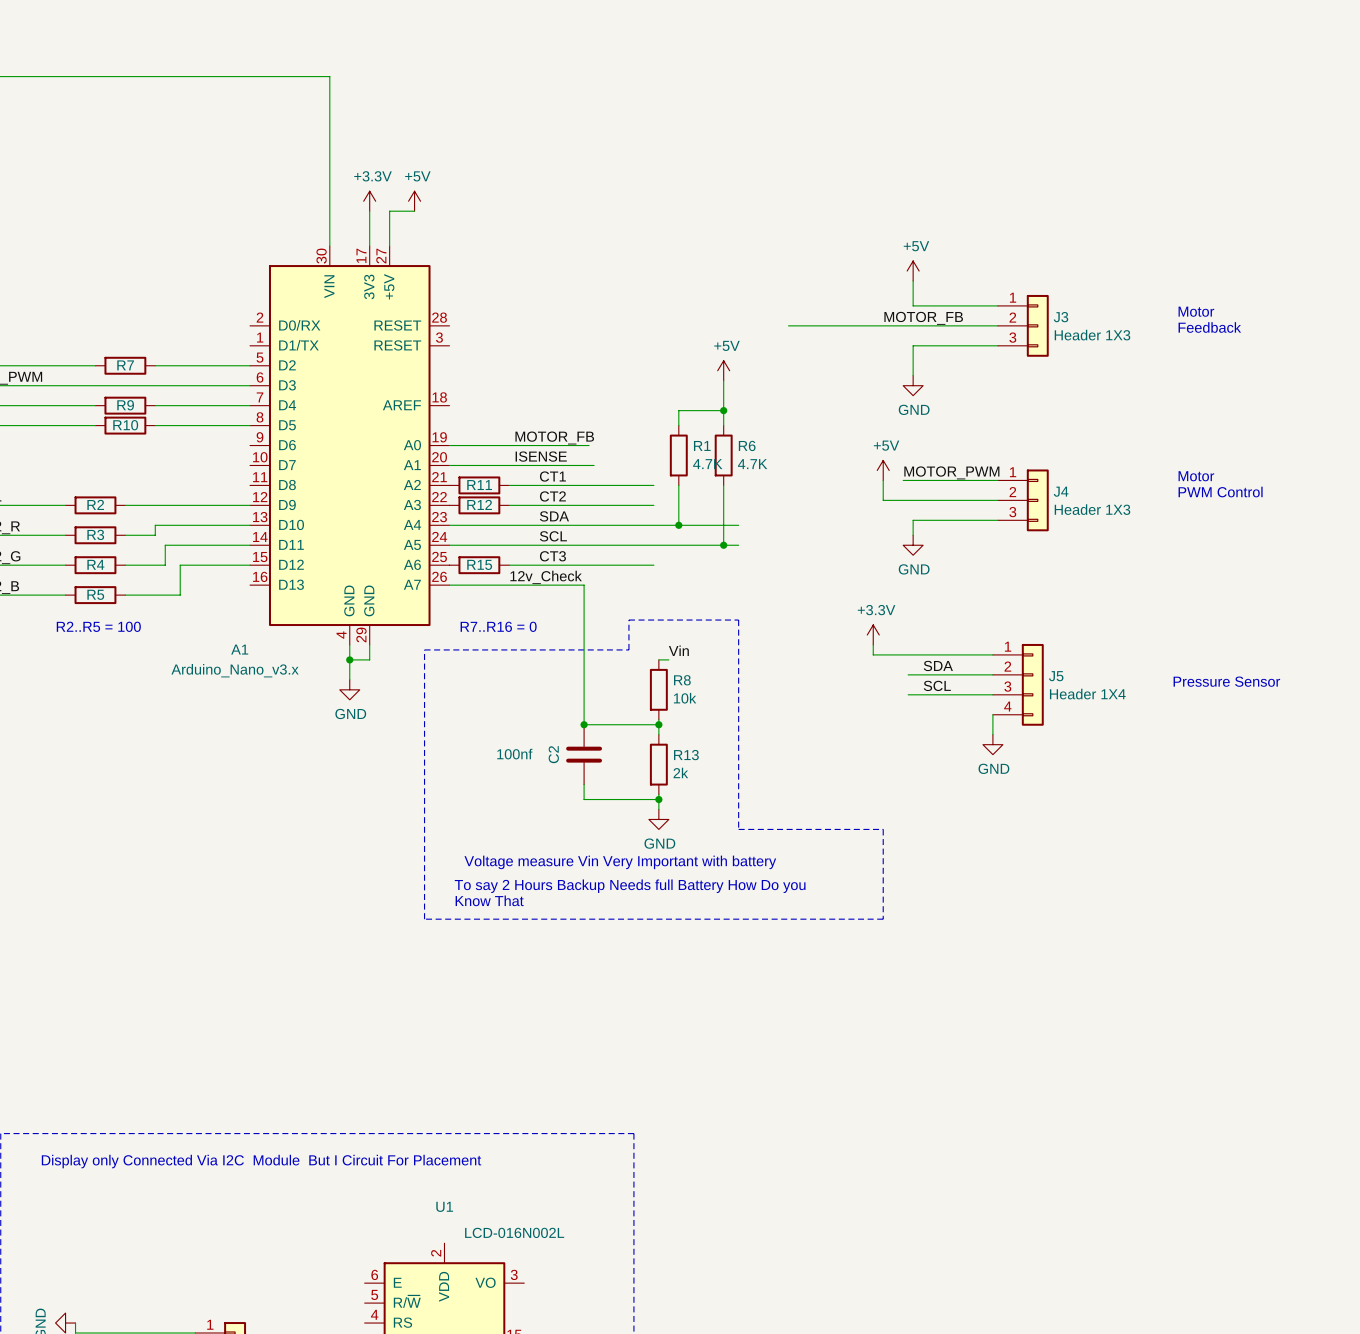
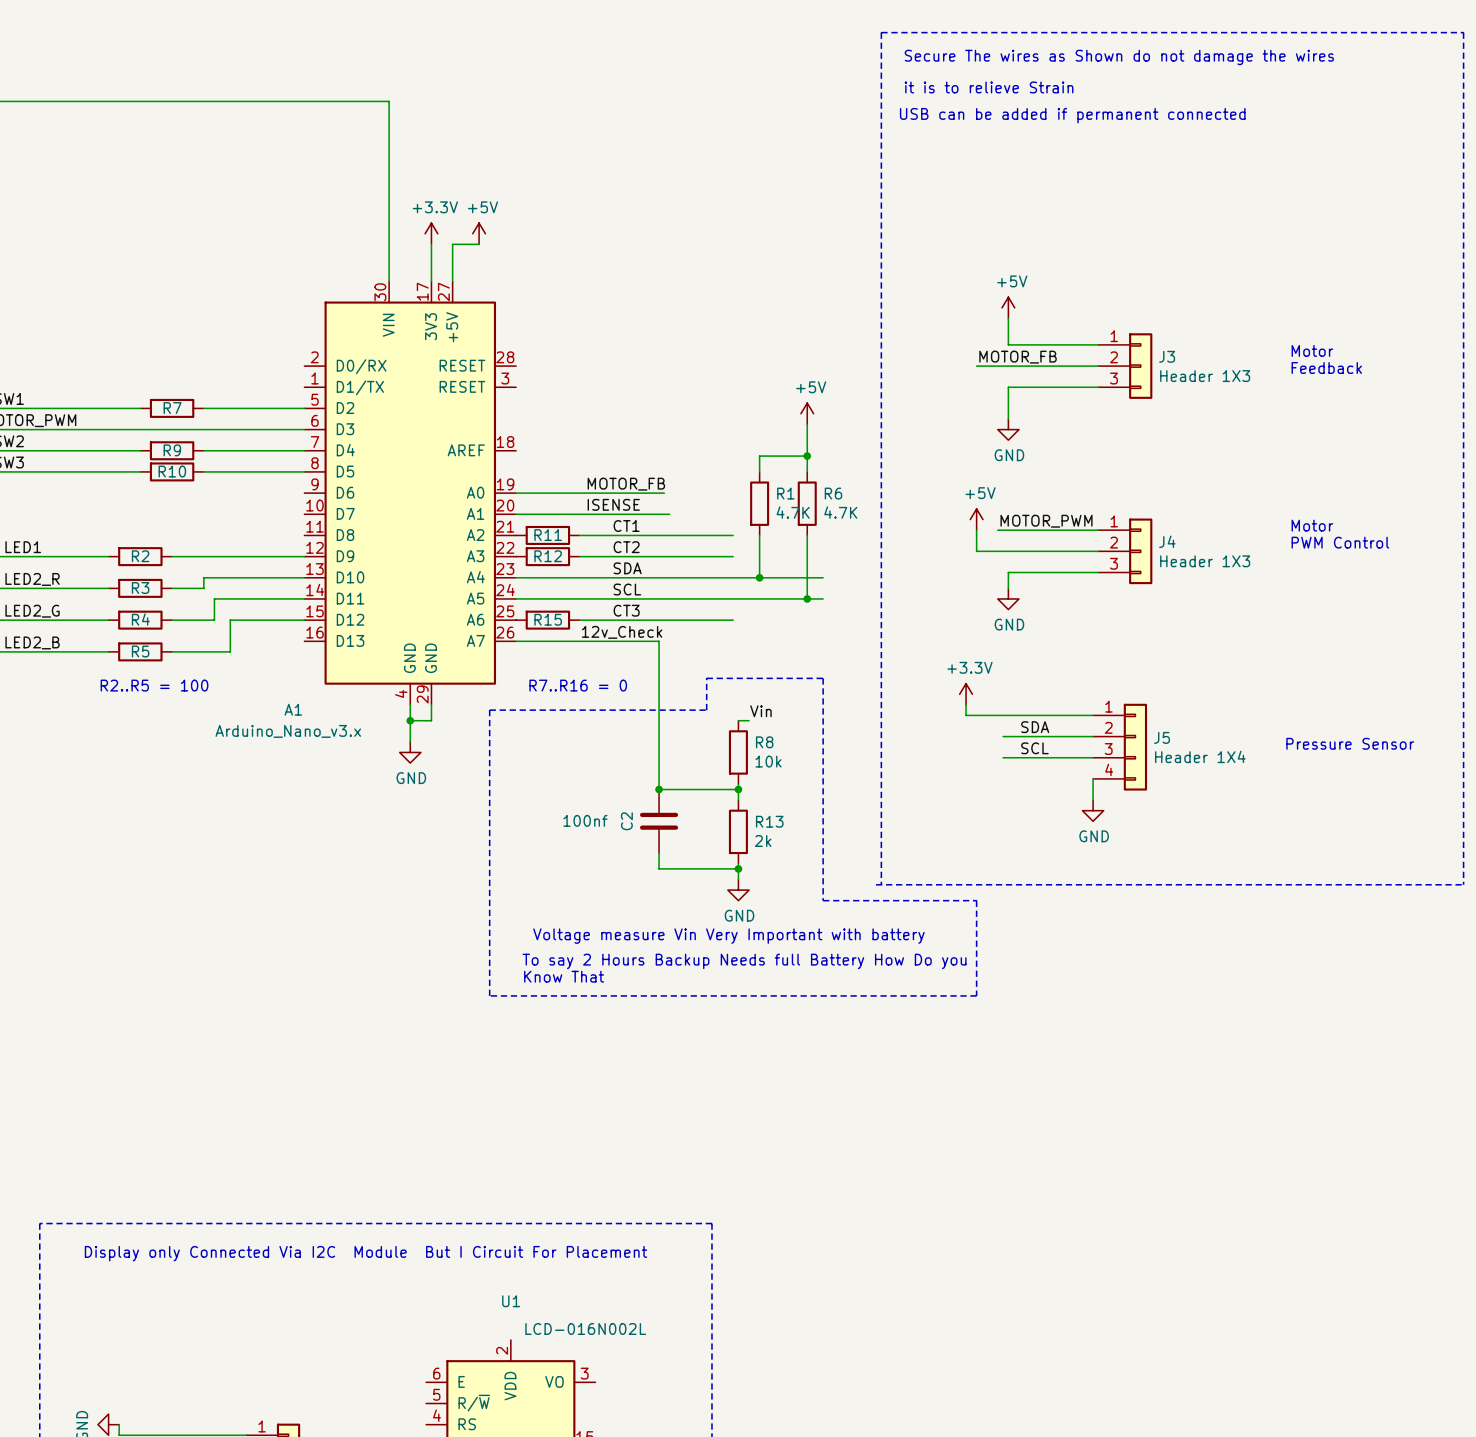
text: none -> Secure The wires as Shown do not damage the wires (1119, 57)
text: none -> it is to relieve Strain (989, 87)
text: none -> USB can be added if permanent connected (1072, 115)
wire: (788, 325) (883, 325) -> none
line: none -> (876, 884) (1463, 884) (1463, 32) (881, 32) (881, 884)

